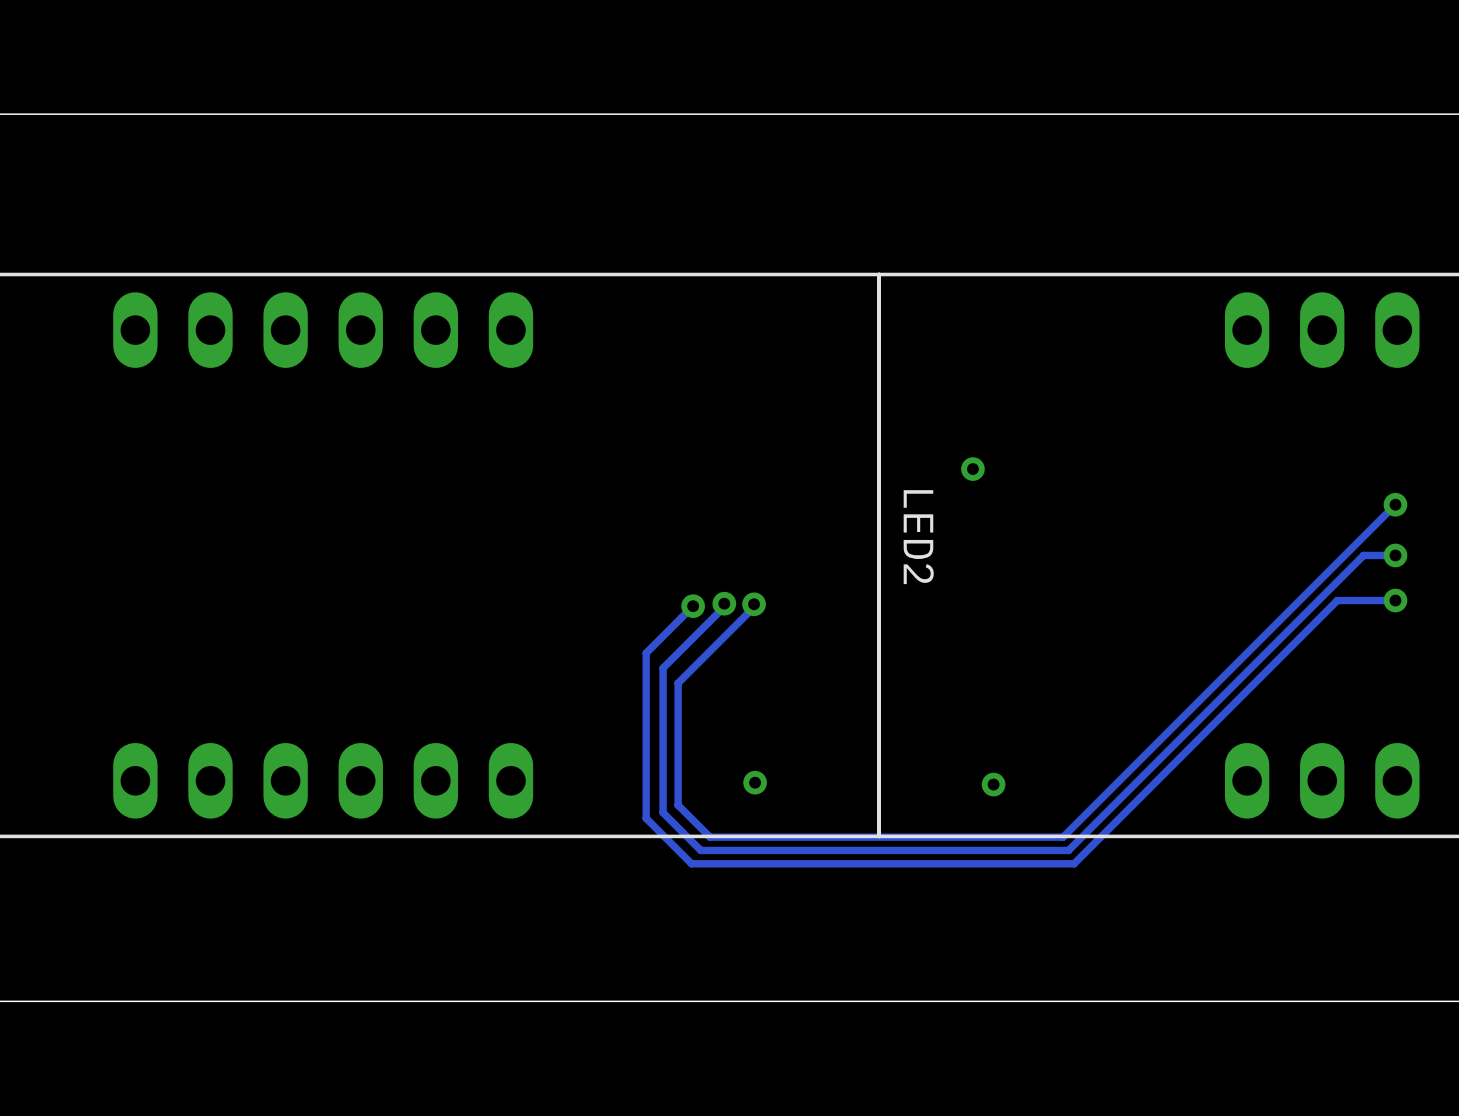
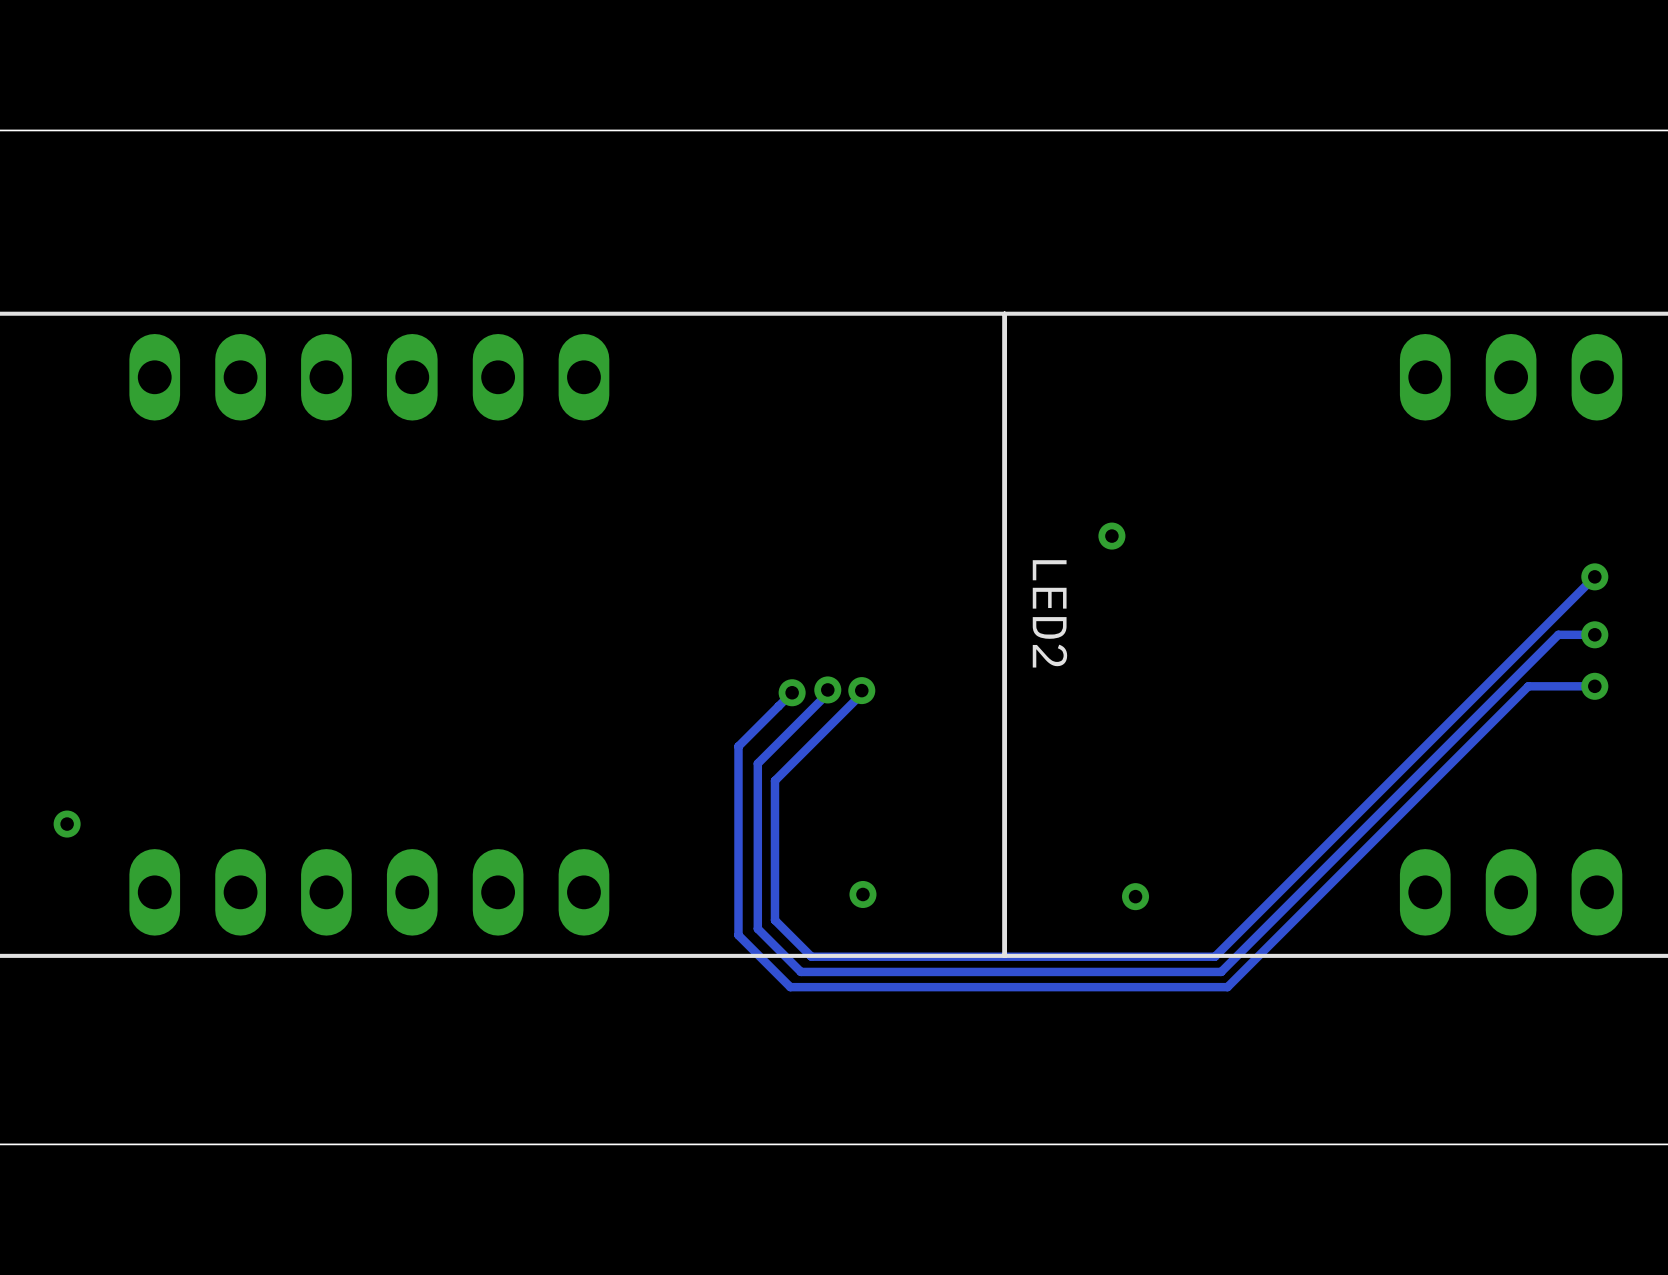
via: none -> (67, 824)

